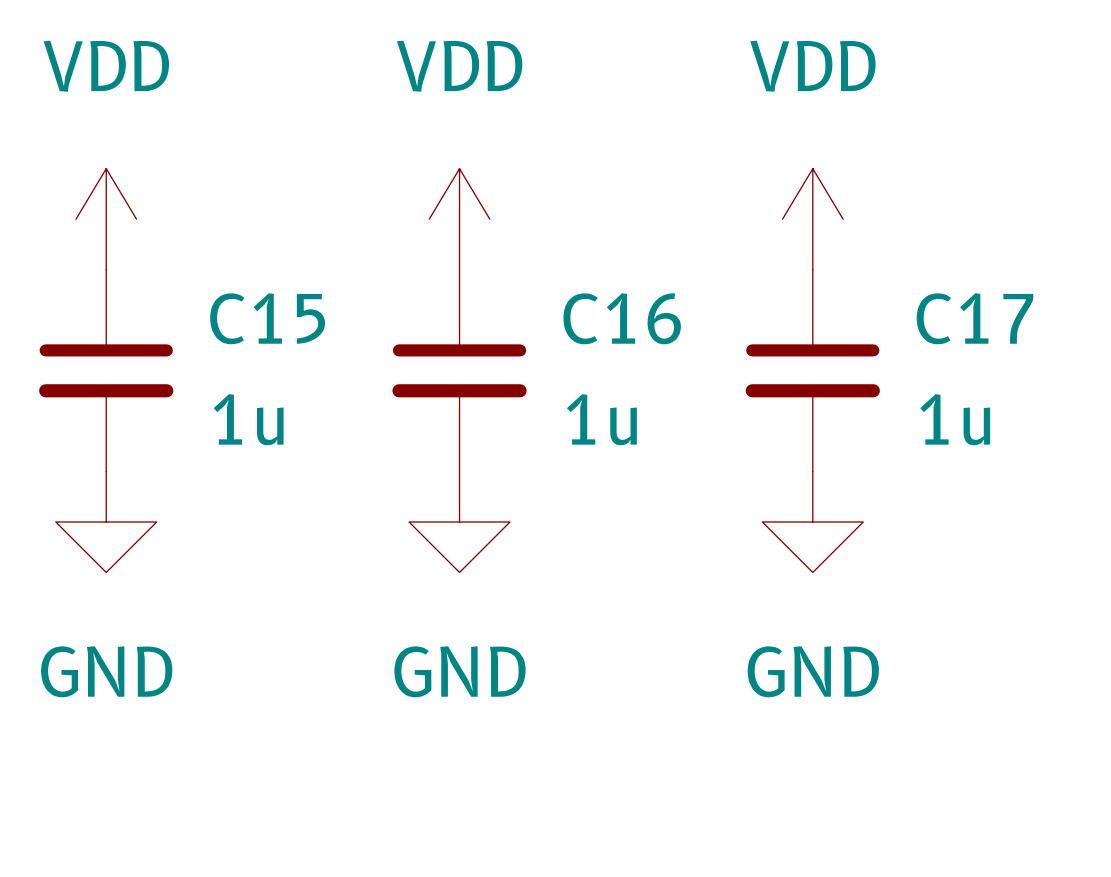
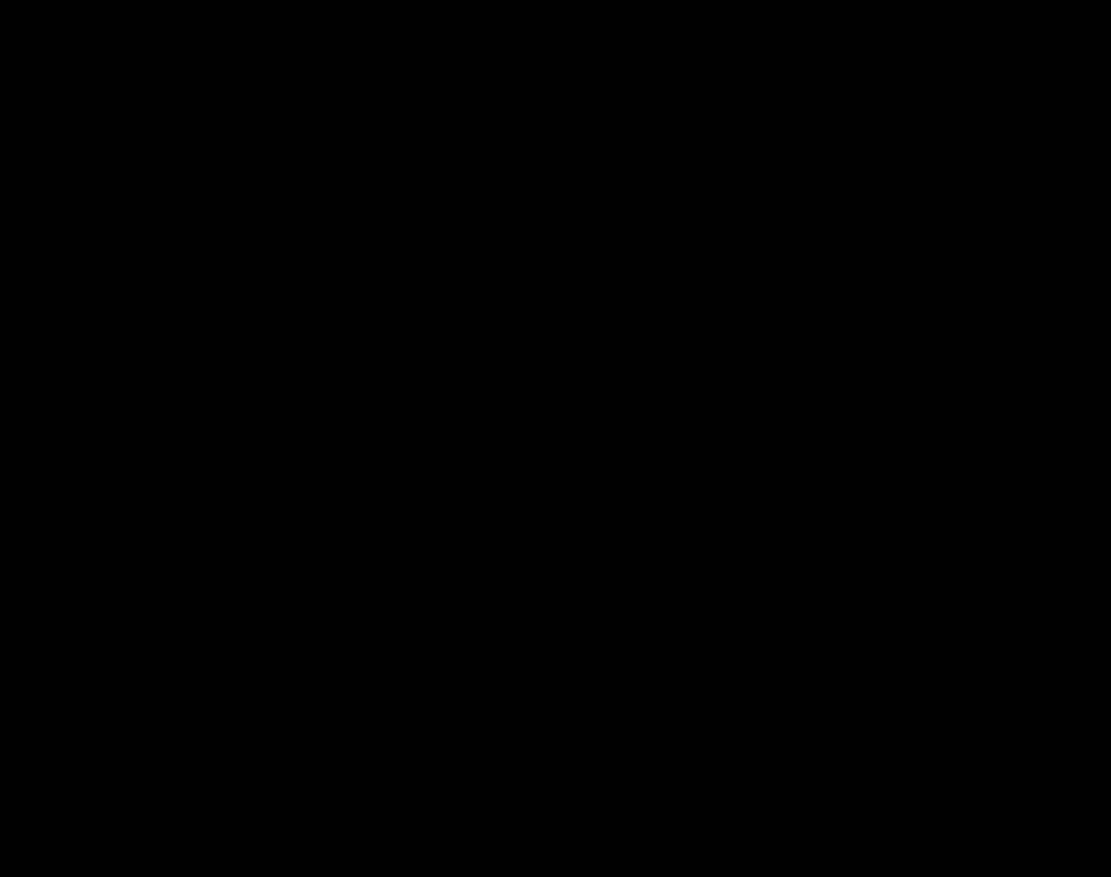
power symbol: VDD (106, 219) -> none
power symbol: VDD (459, 219) -> none
power symbol: VDD (812, 219) -> none
C15: 1u (106, 370) -> none
C16: 1u (459, 370) -> none
C17: 1u (812, 370) -> none
power symbol: GND (106, 521) -> none
power symbol: GND (459, 521) -> none
power symbol: GND (812, 521) -> none

